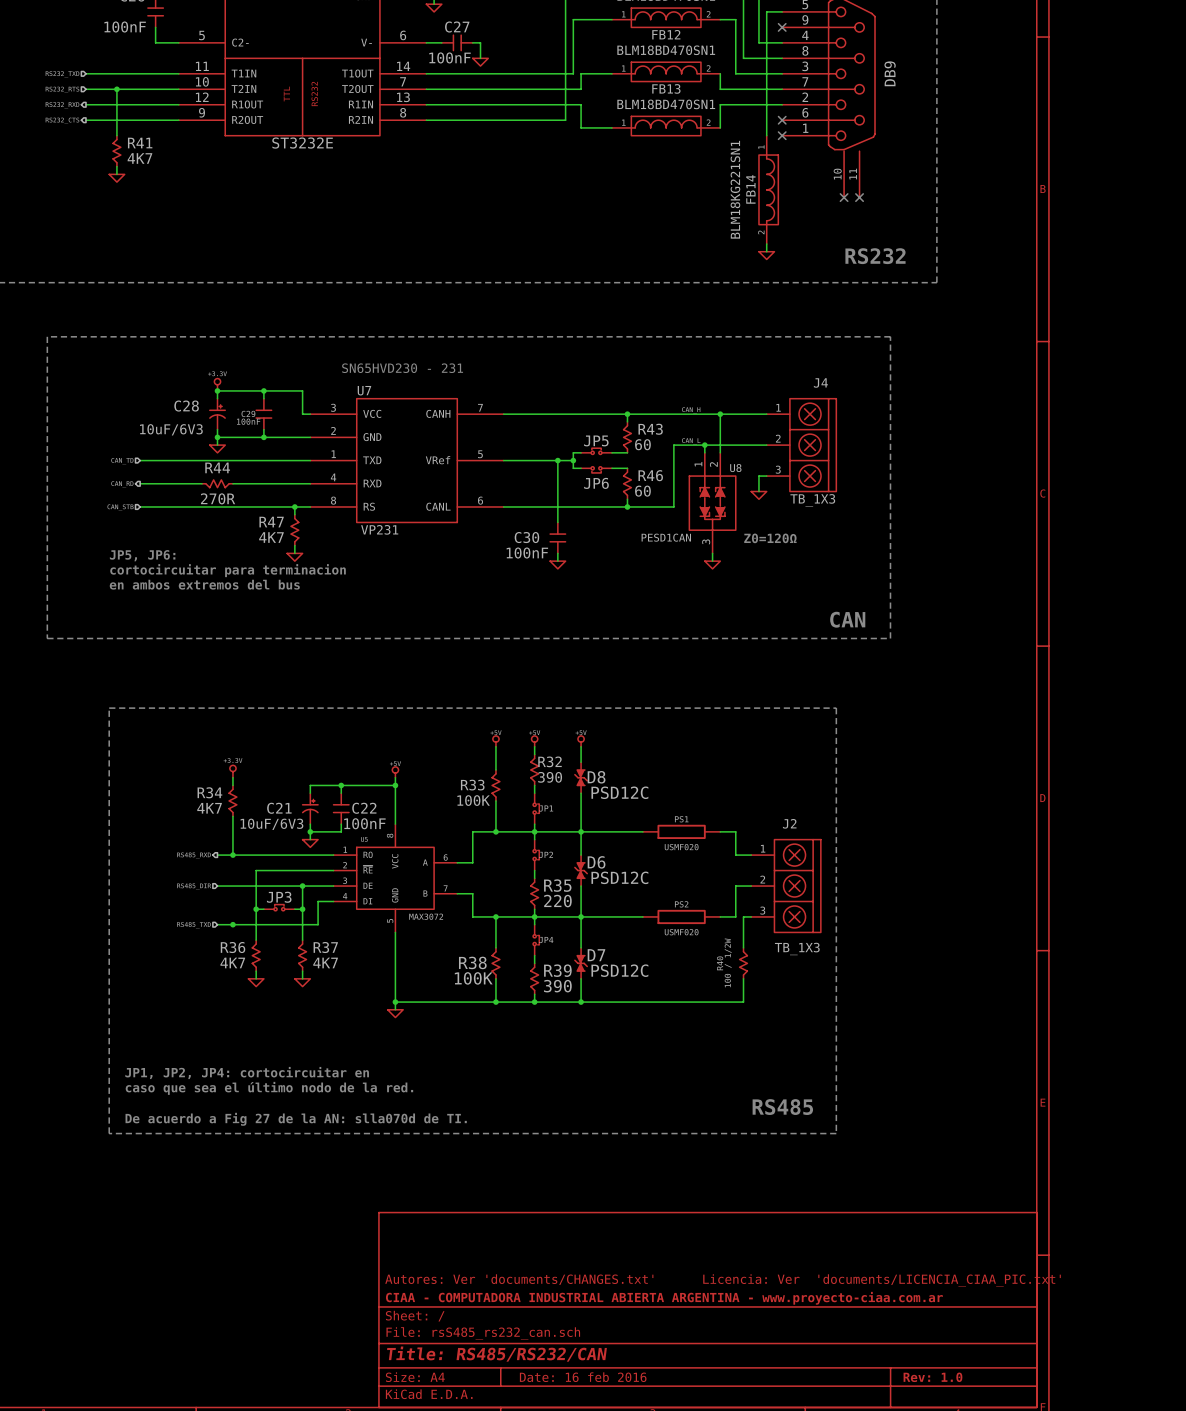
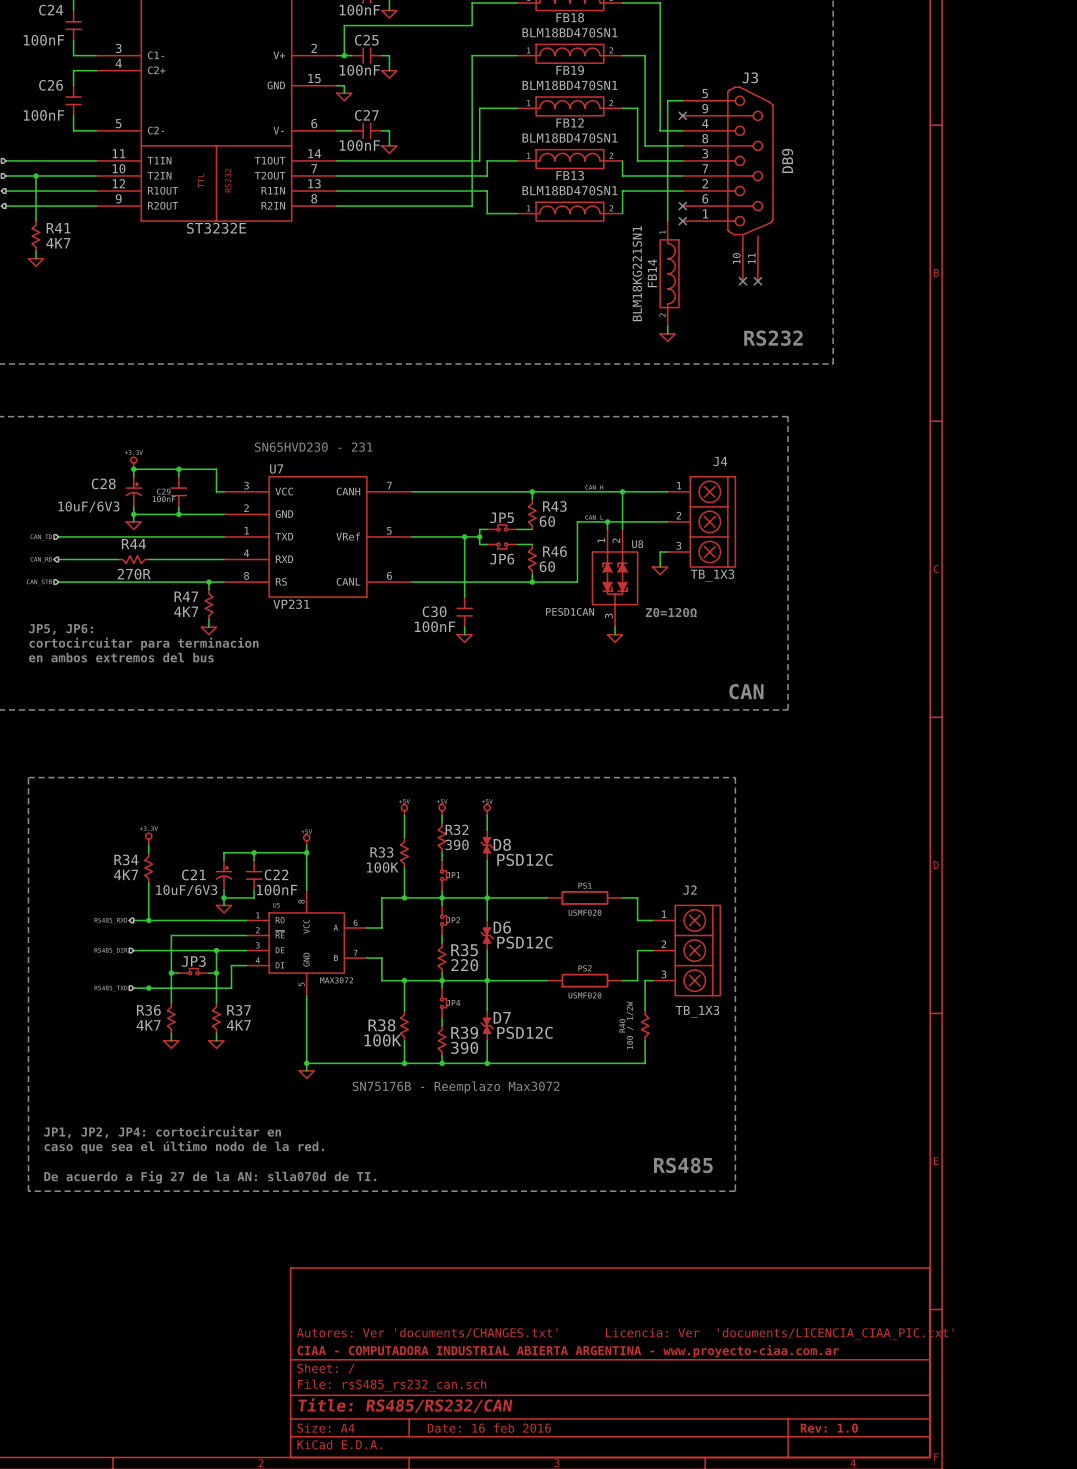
text: none -> SN75176B - Reemplazo Max3072 (456, 1087)

